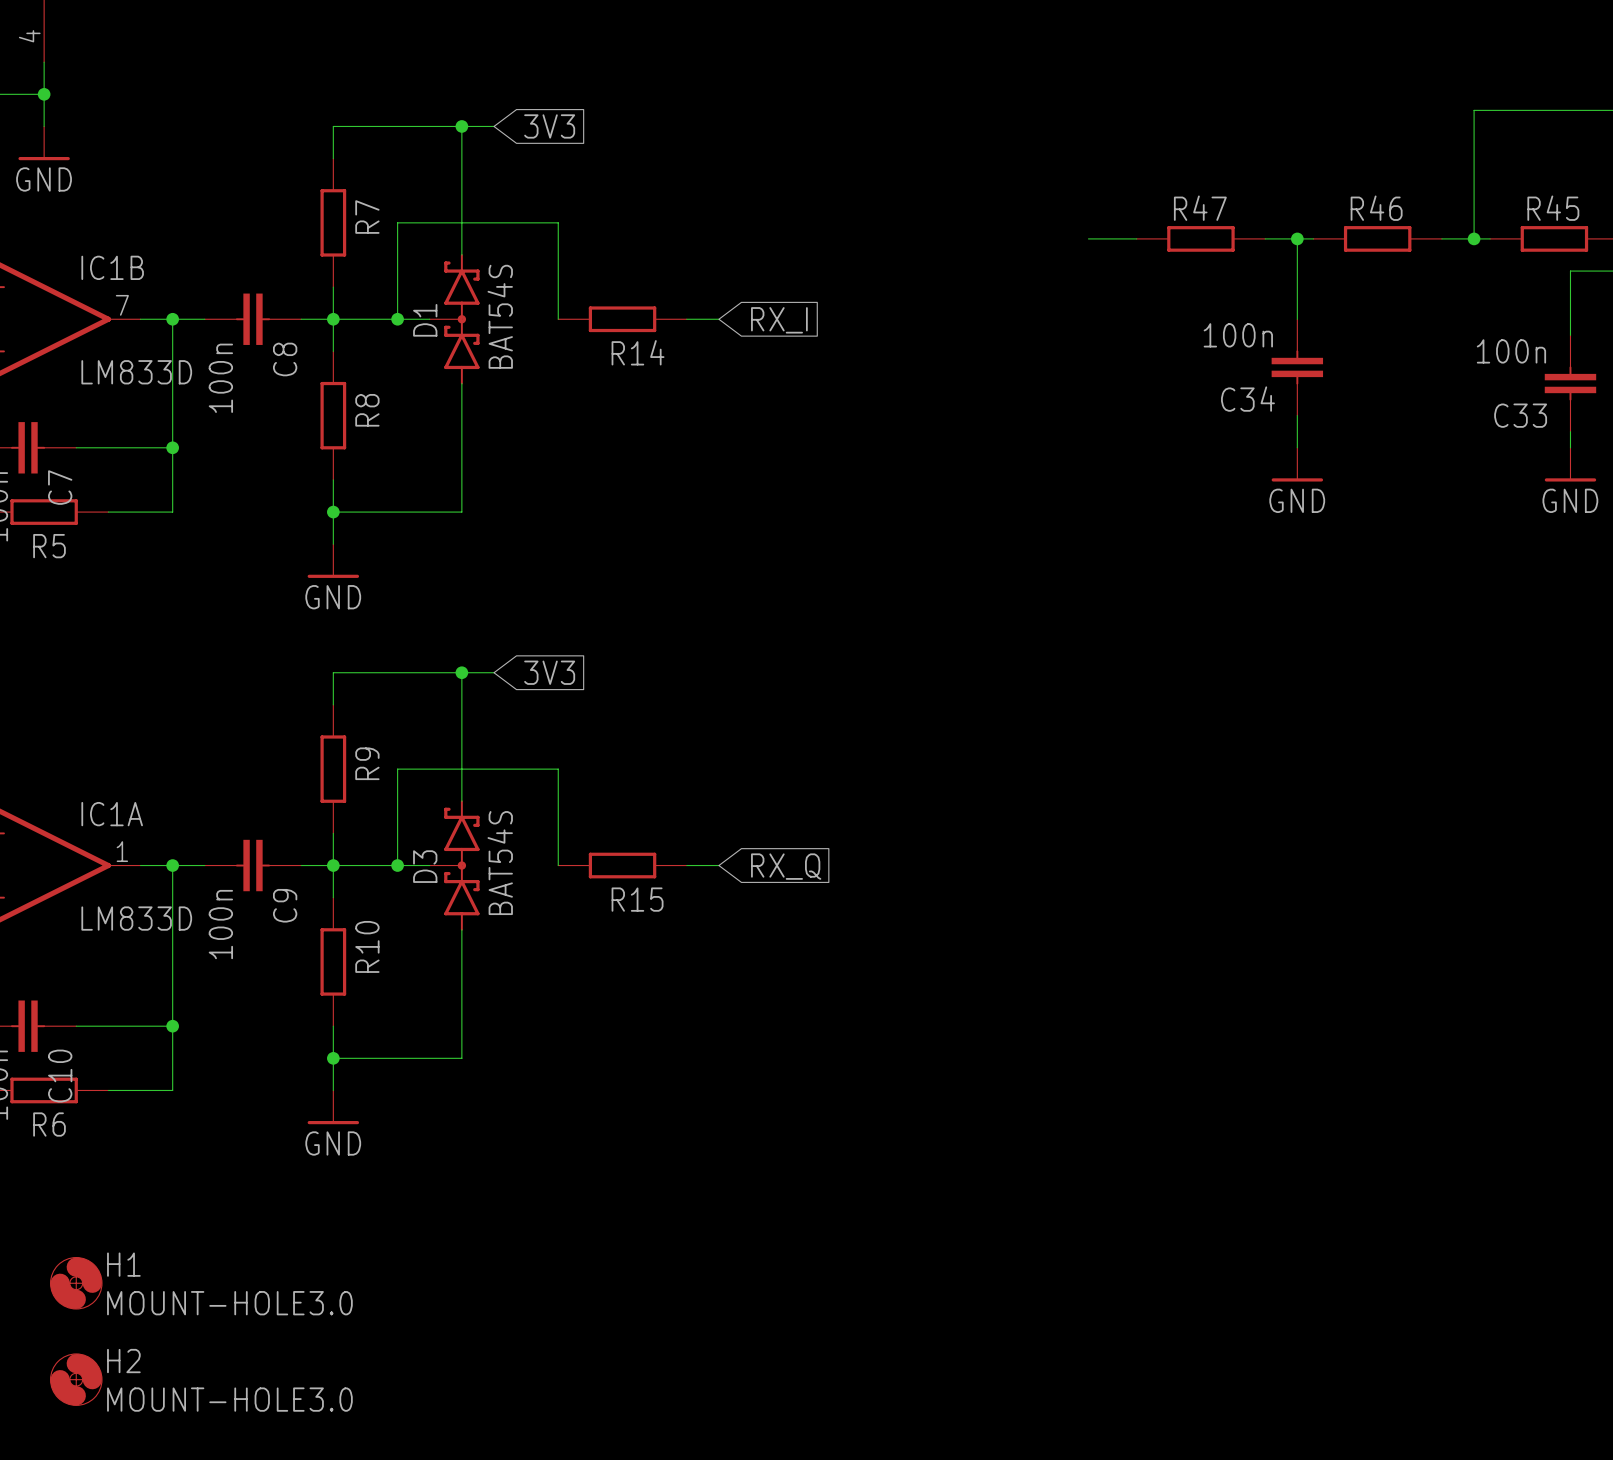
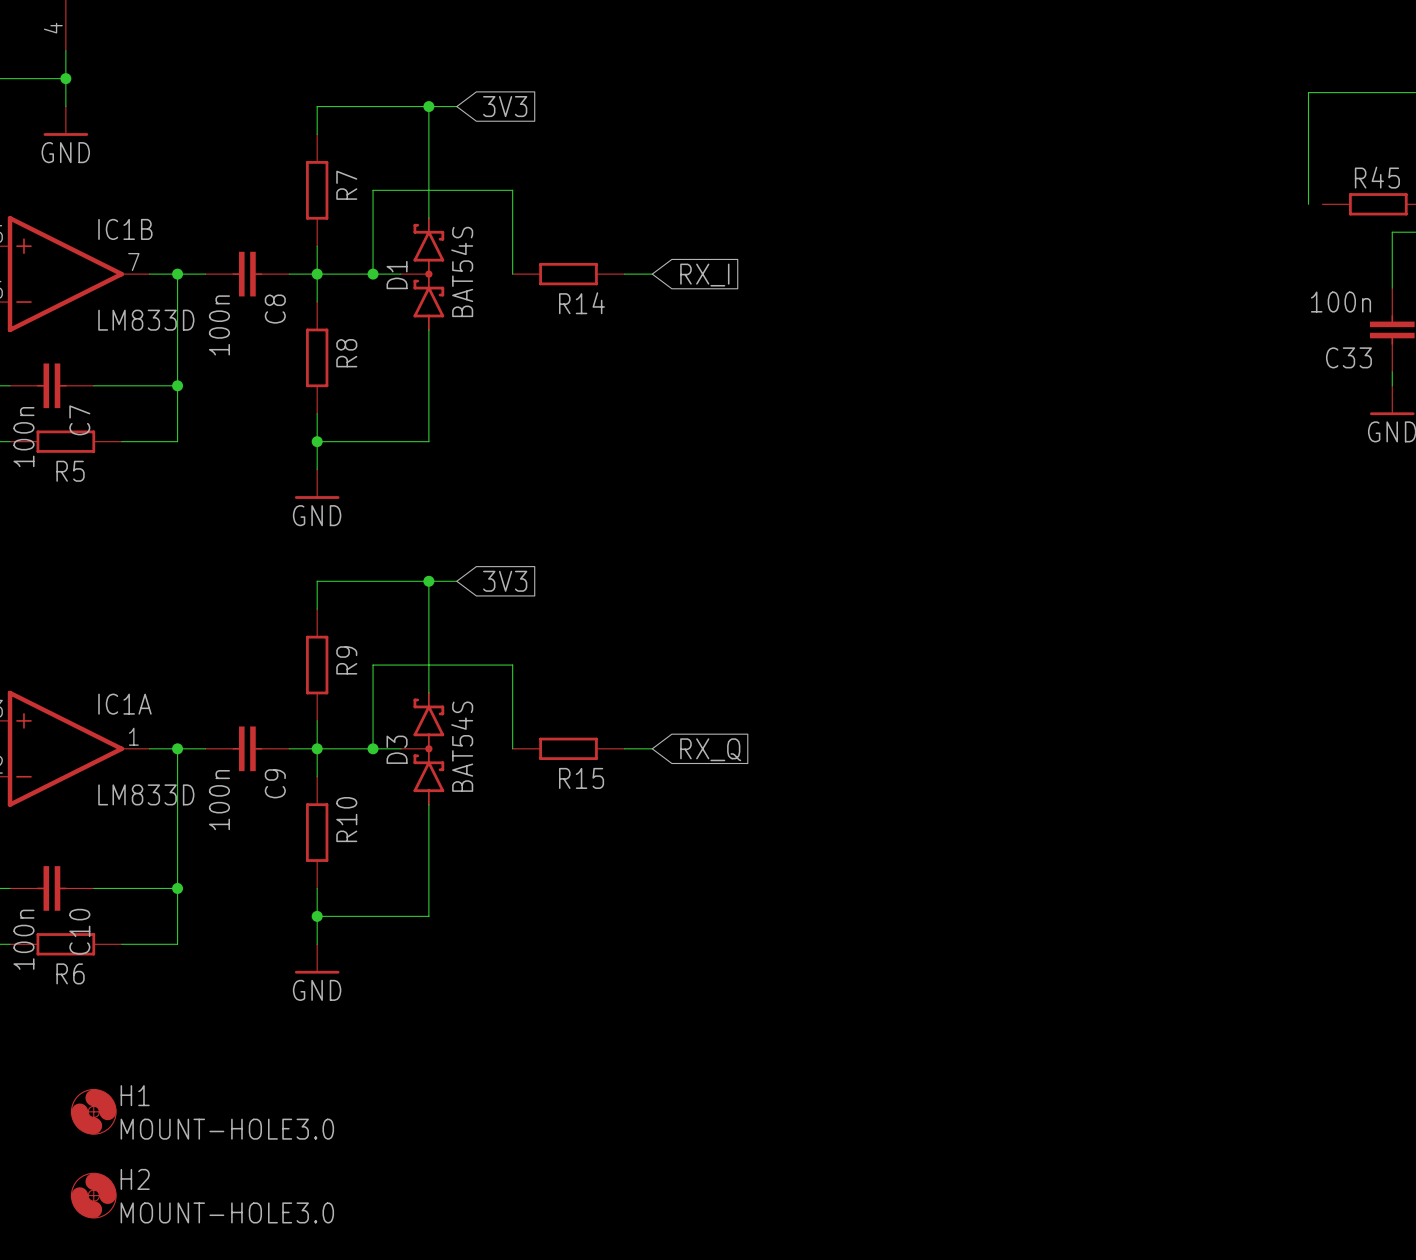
wire: (1088, 238) (1136, 238) -> none
R47: (1200, 238) -> none
wire: (1265, 238) (1313, 238) -> none
wire: (1297, 238) (1297, 319) -> none
junction: (1297, 238) -> none
R46: (1377, 238) -> none
wire: (1441, 238) (1490, 238) -> none
junction: (1474, 238) -> none
C34: 100n (1297, 367) -> none
wire: (1297, 415) (1297, 447) -> none
power symbol: GND (1297, 464) -> none

